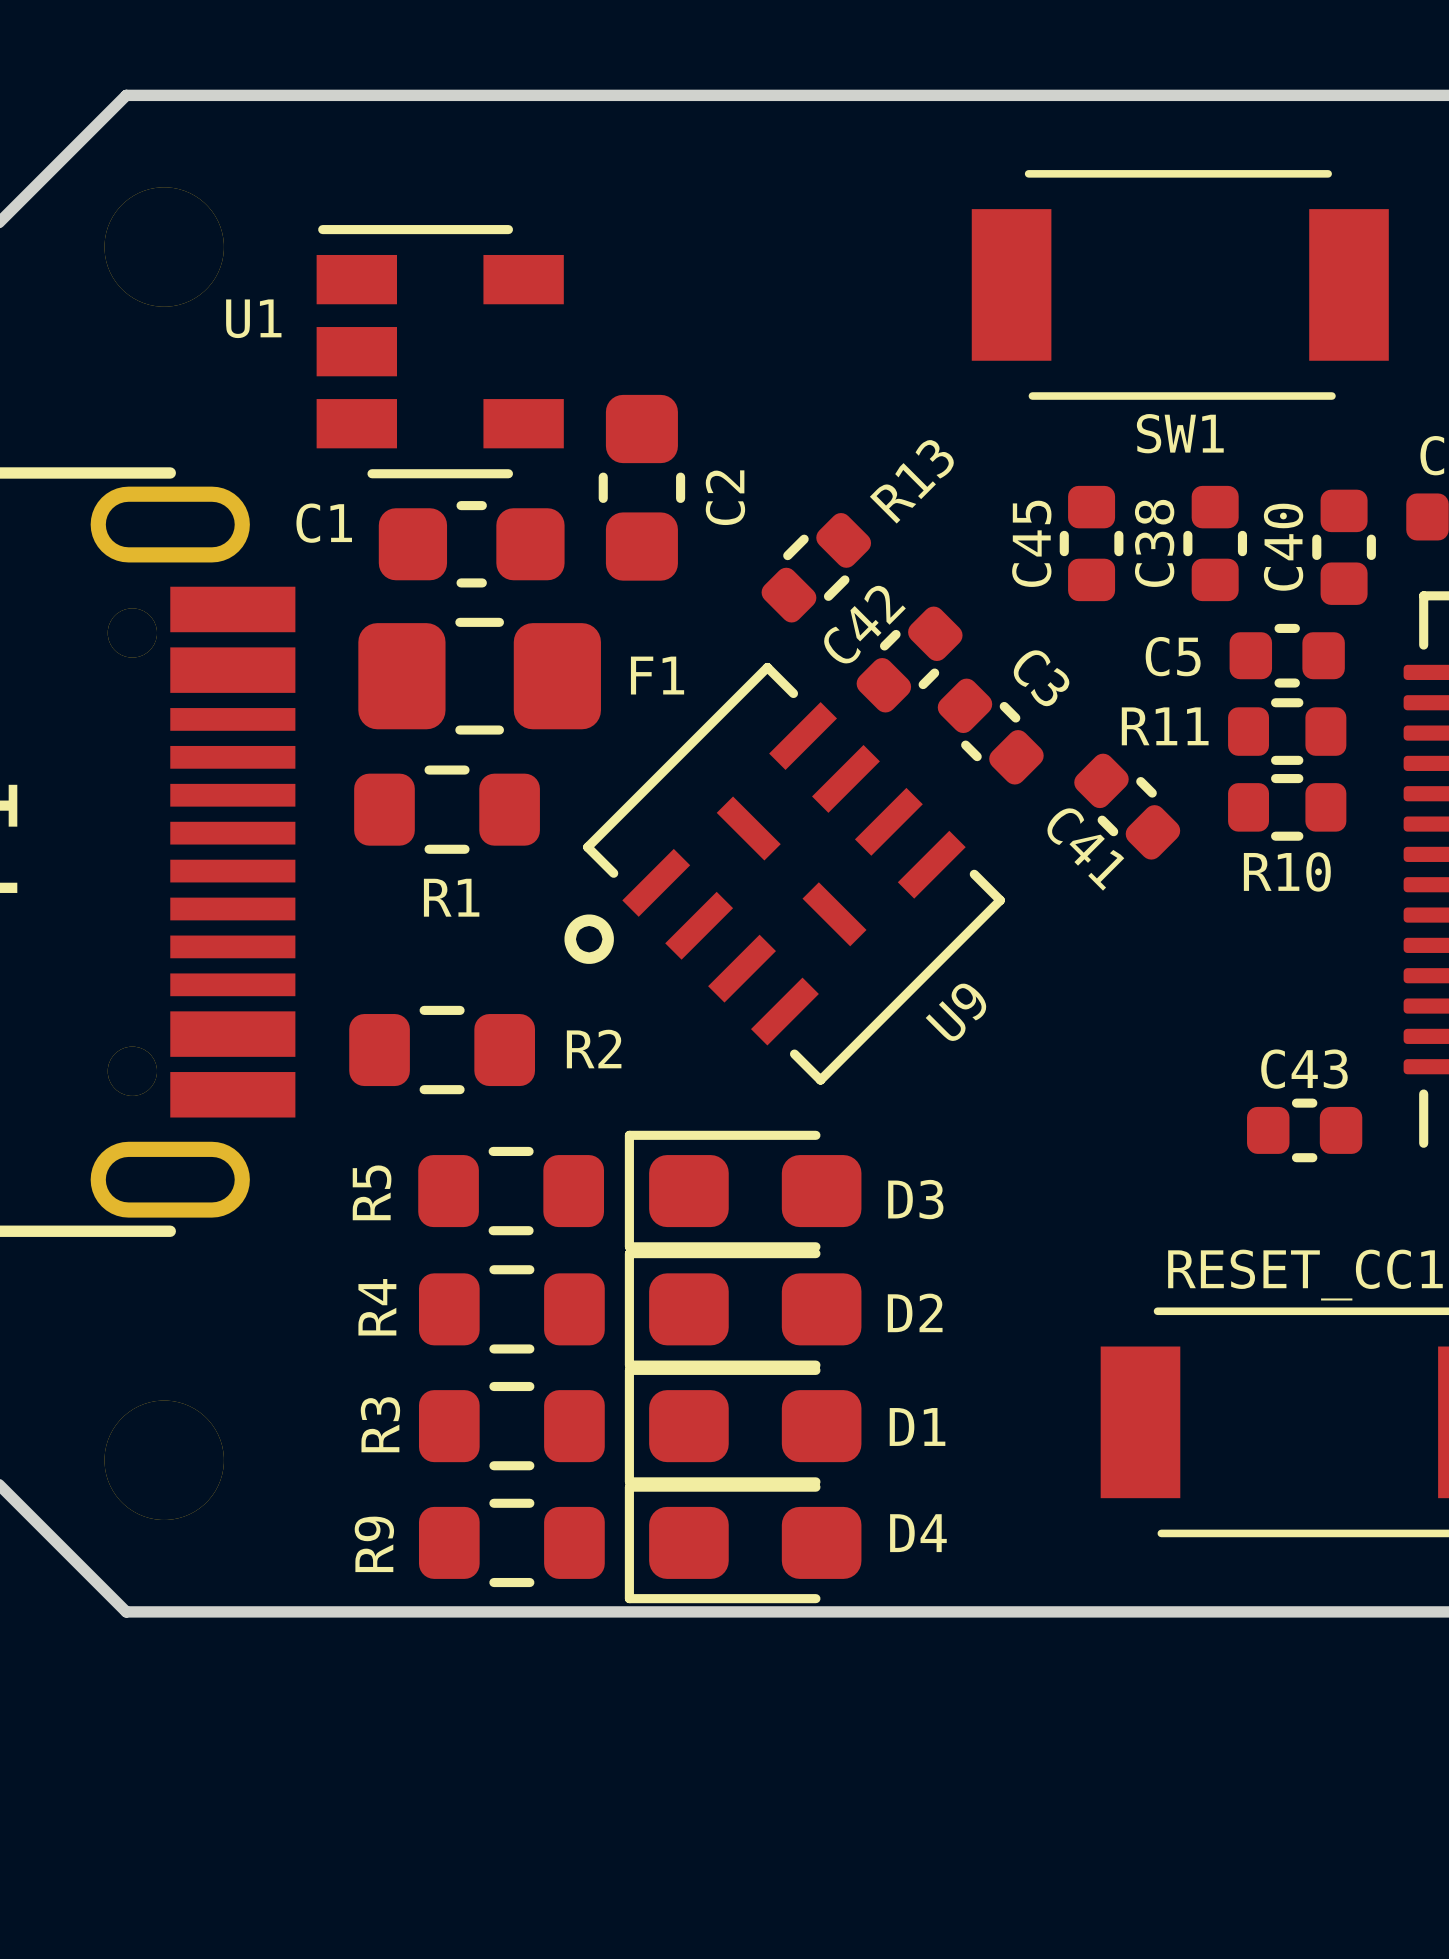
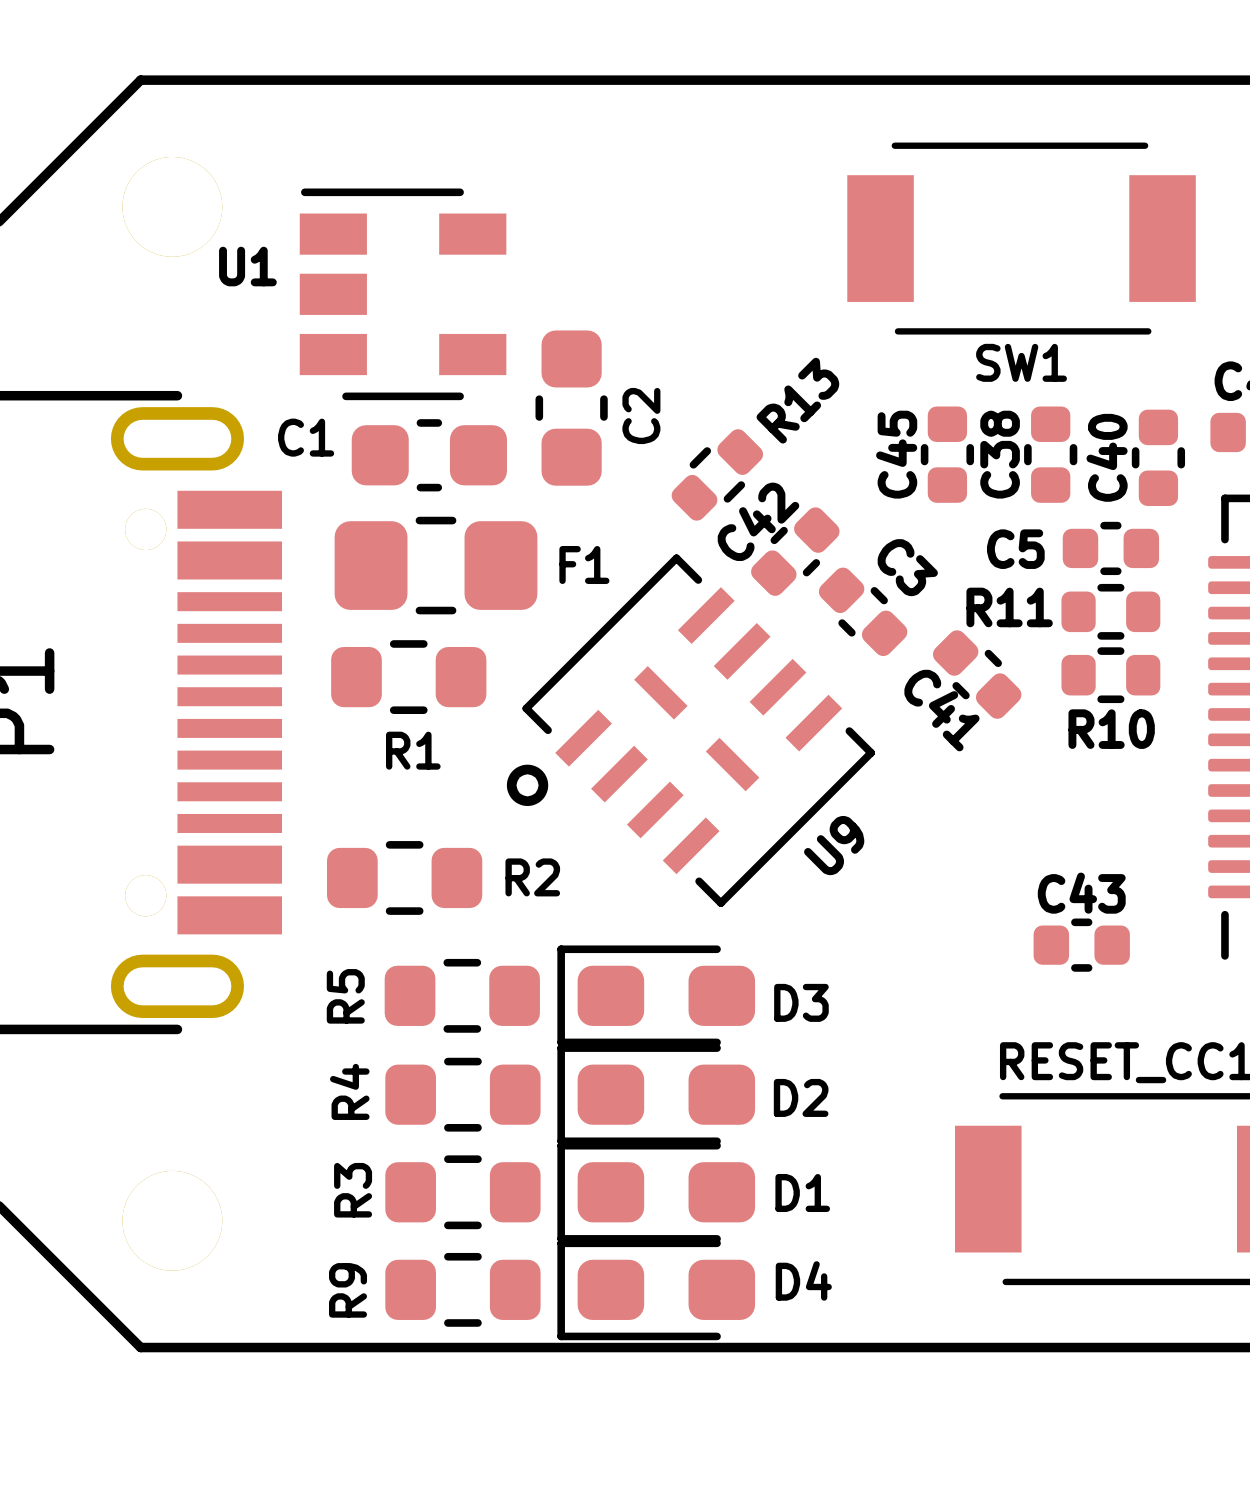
C43 position: (1304, 1130) -> (1081, 945)

